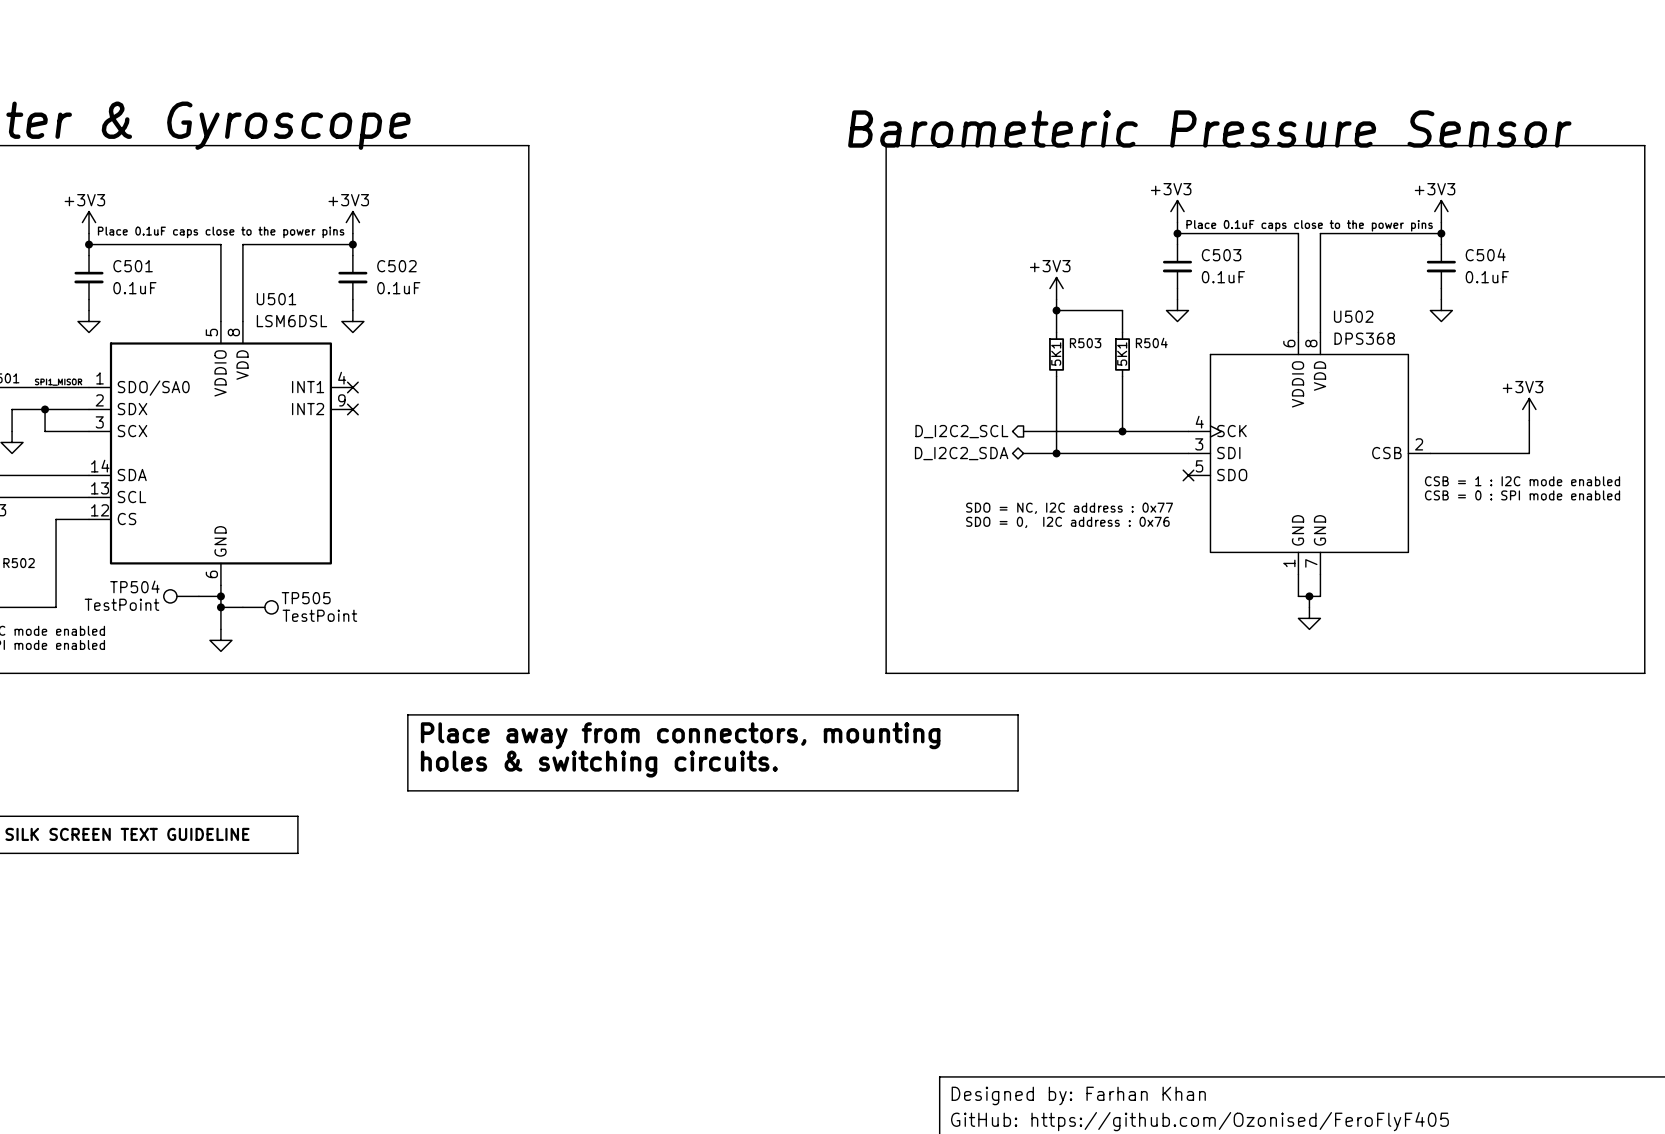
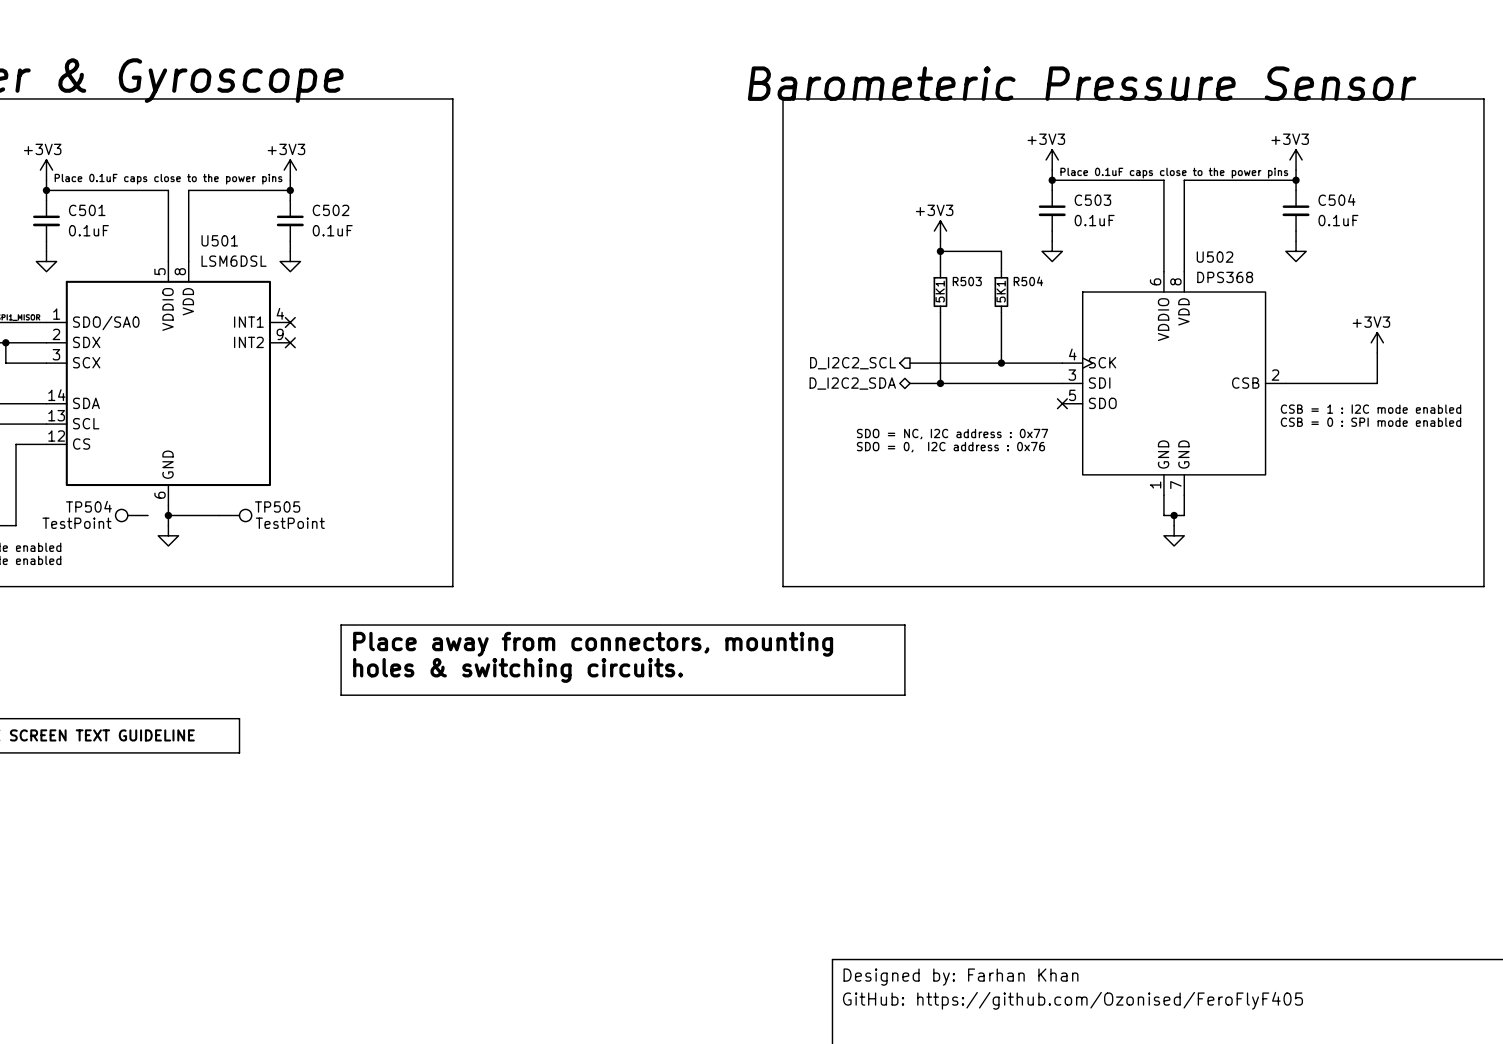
wire: (198, 596) (220, 596) -> (219, 515) (168, 515)
junction: (220, 607) -> none
wire: (242, 607) (220, 607) (220, 629) -> none
TP505 position: (260, 607) -> (235, 515)
power symbol position: (220, 640) -> (168, 535)

